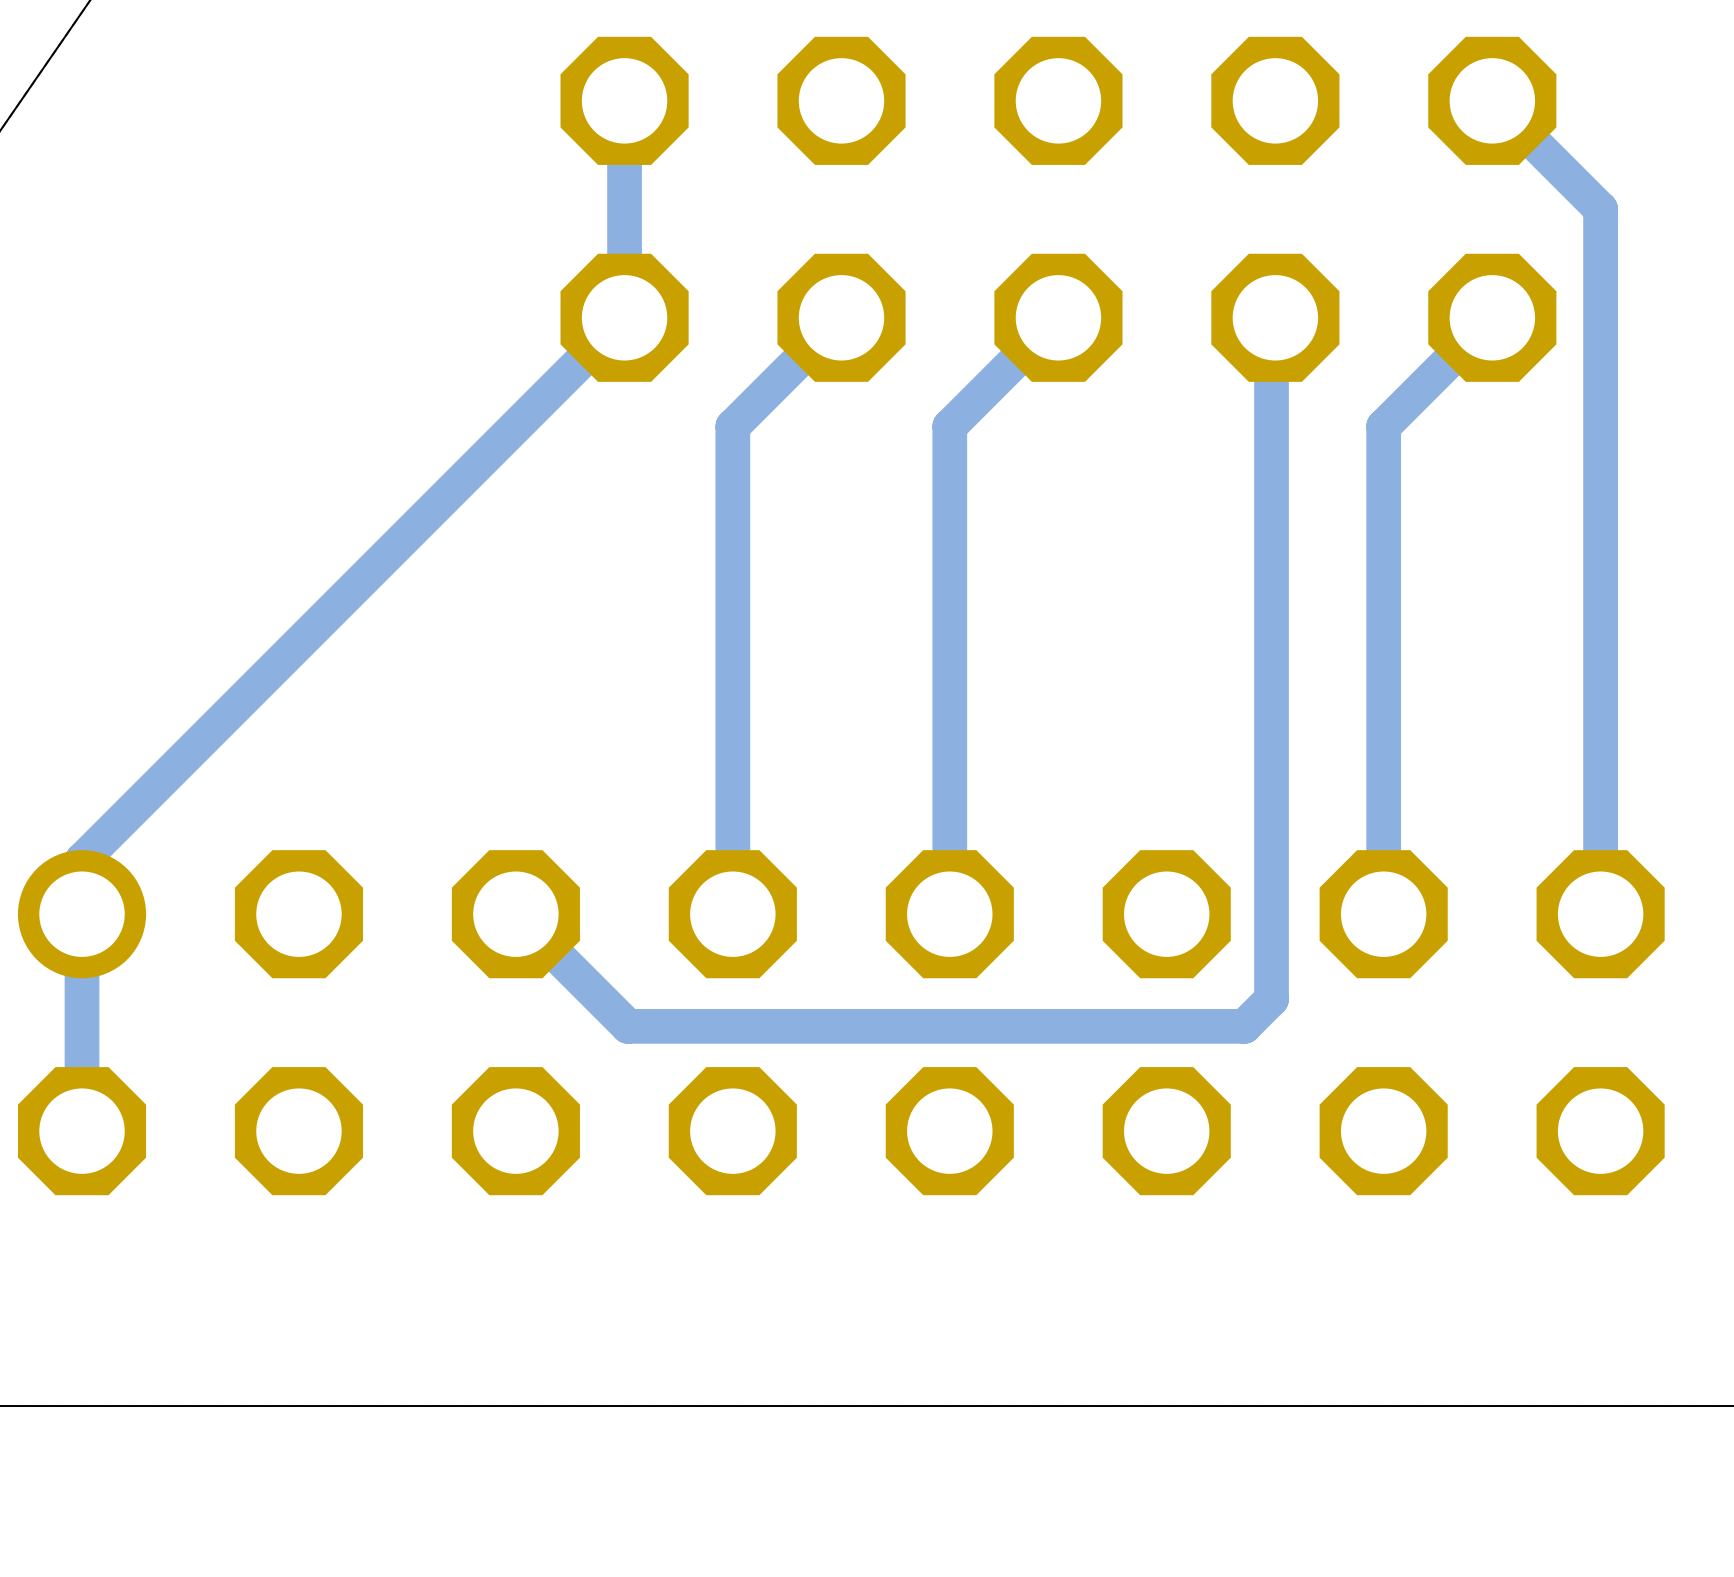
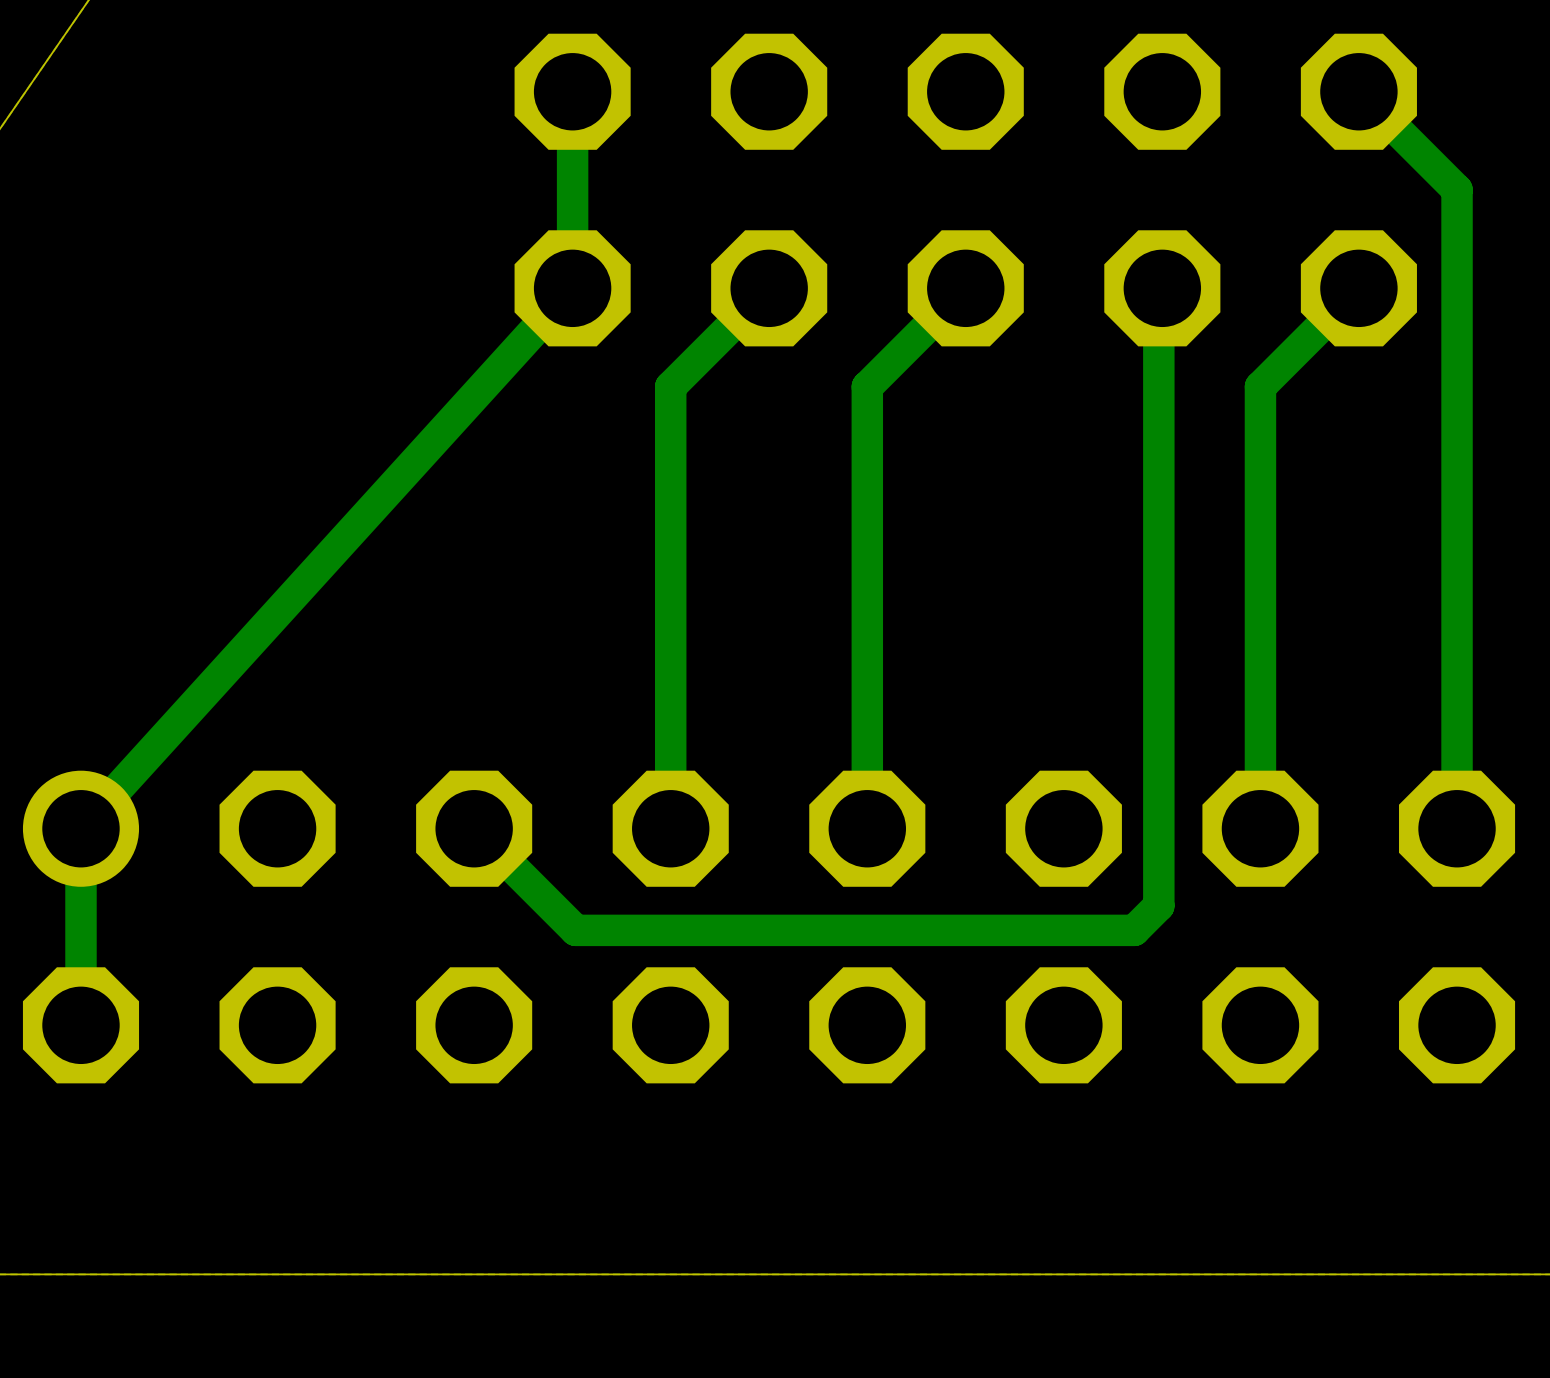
bottom track: (624, 317) (82, 860) (82, 914) -> (572, 288) (81, 828)

